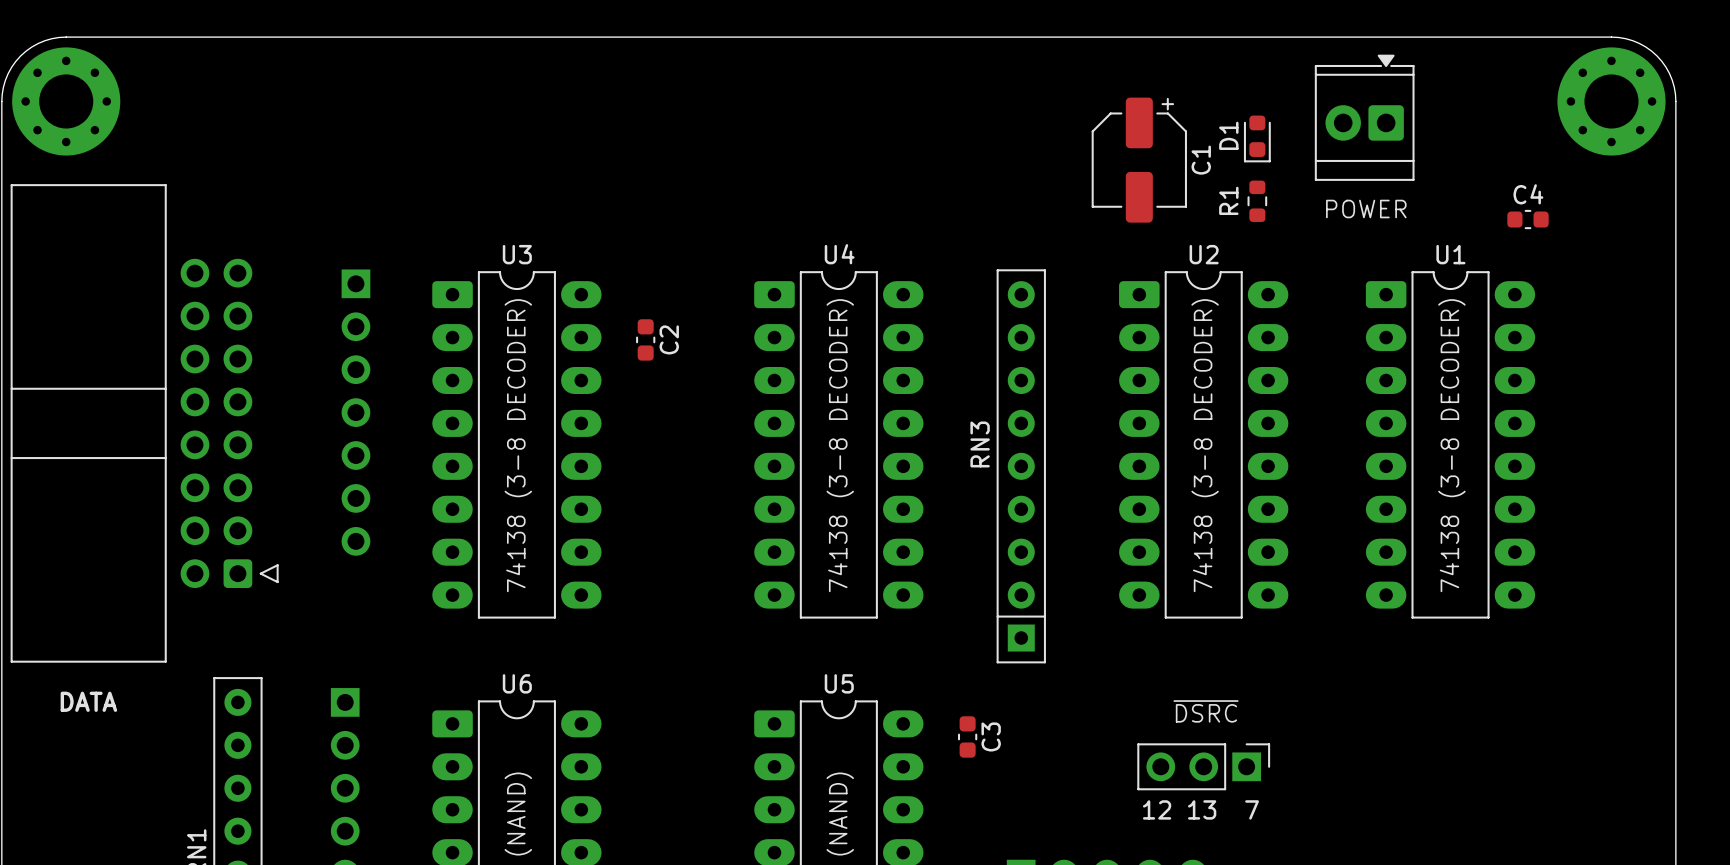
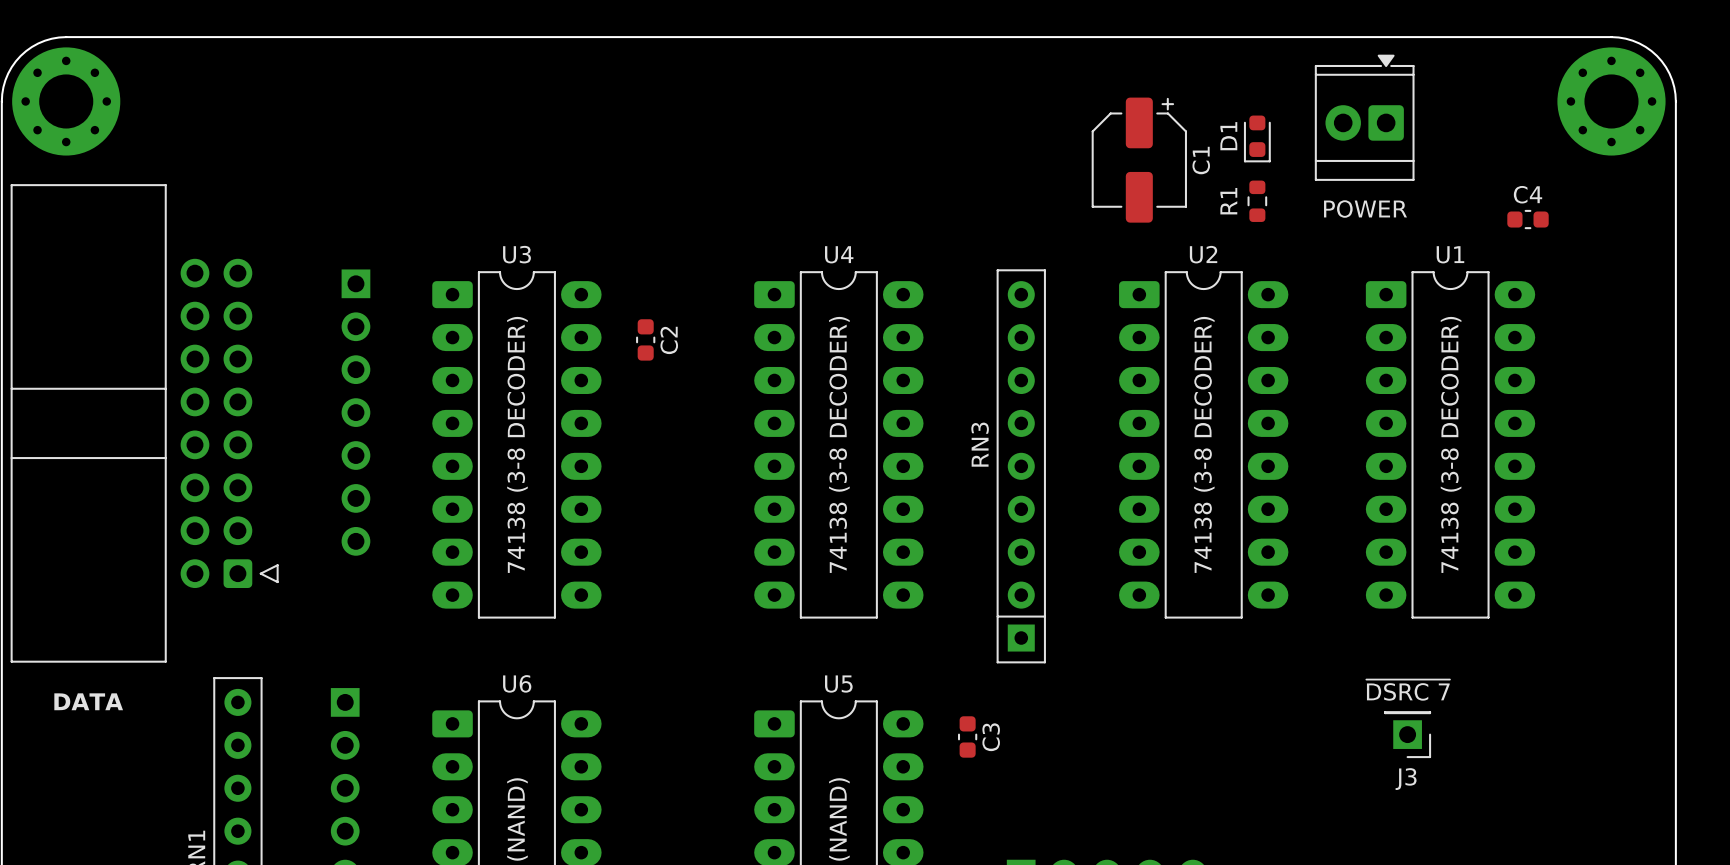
text: none -> ~{DSRC 7} (1408, 690)
text: ~{DSRC} (1206, 711) -> none
J3: none -> (1407, 734)
part: (1203, 766) -> none
text: 12 13 7 (1200, 809) -> none

